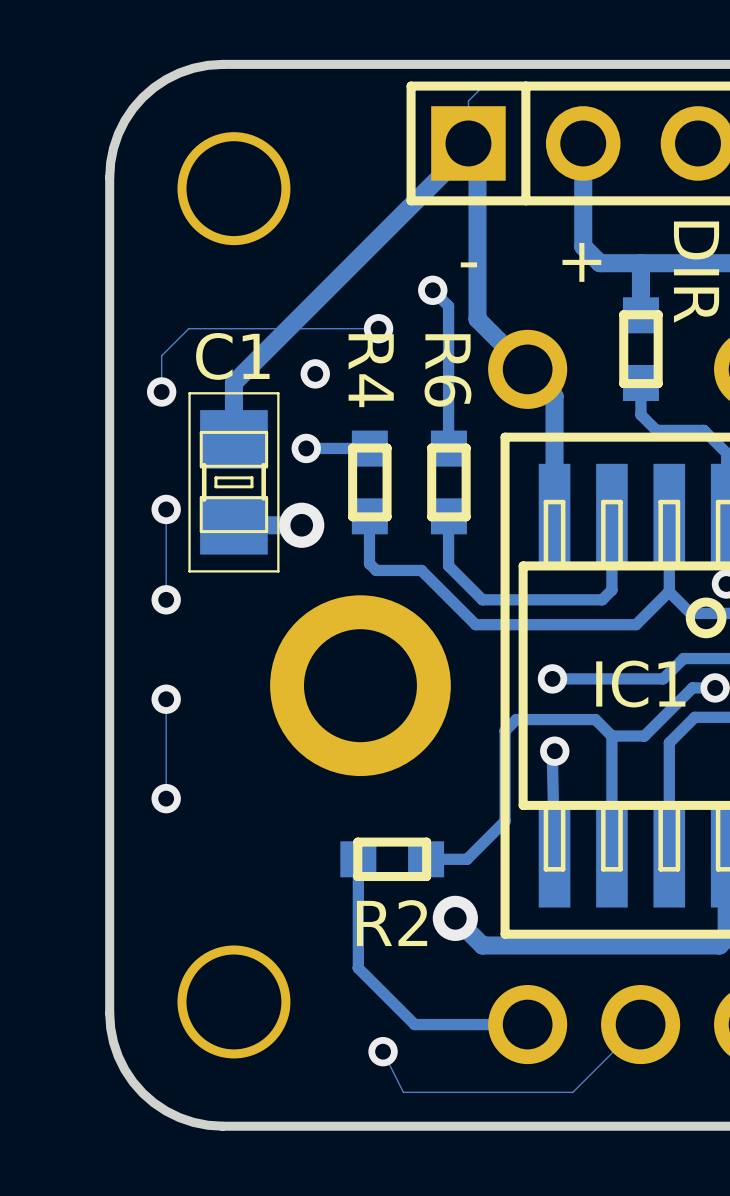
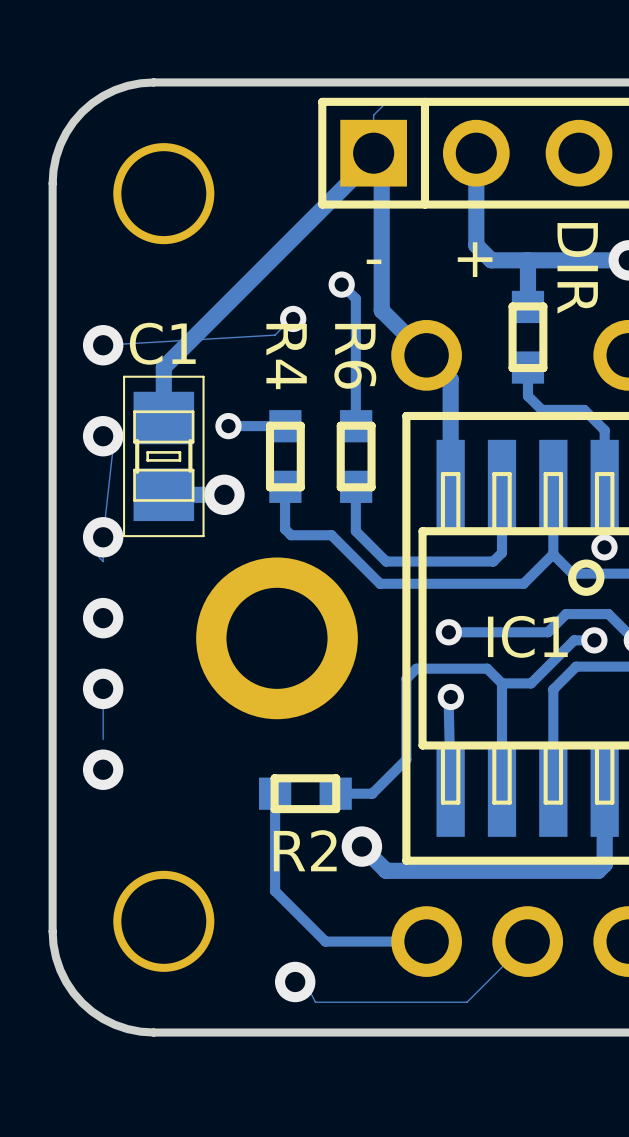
track: (378, 328) (188, 328) (161, 355) (161, 391) -> none
track: none -> (285, 325) (274, 335) (103, 345)
via: (315, 373) -> none
via position: (161, 391) -> (103, 345)
via: none -> (103, 436)
track: (166, 509) (166, 572) -> (103, 436) (113, 446) (103, 537)
via: (166, 509) -> none
via size: [151, 585, 181, 615] -> [82, 517, 124, 558]
track: (166, 699) (166, 742) -> none
via position: (166, 699) -> (103, 618)
via: none -> (103, 688)
via position: (166, 798) -> (103, 769)
via size: [368, 1036, 398, 1067] -> [274, 961, 316, 1003]

